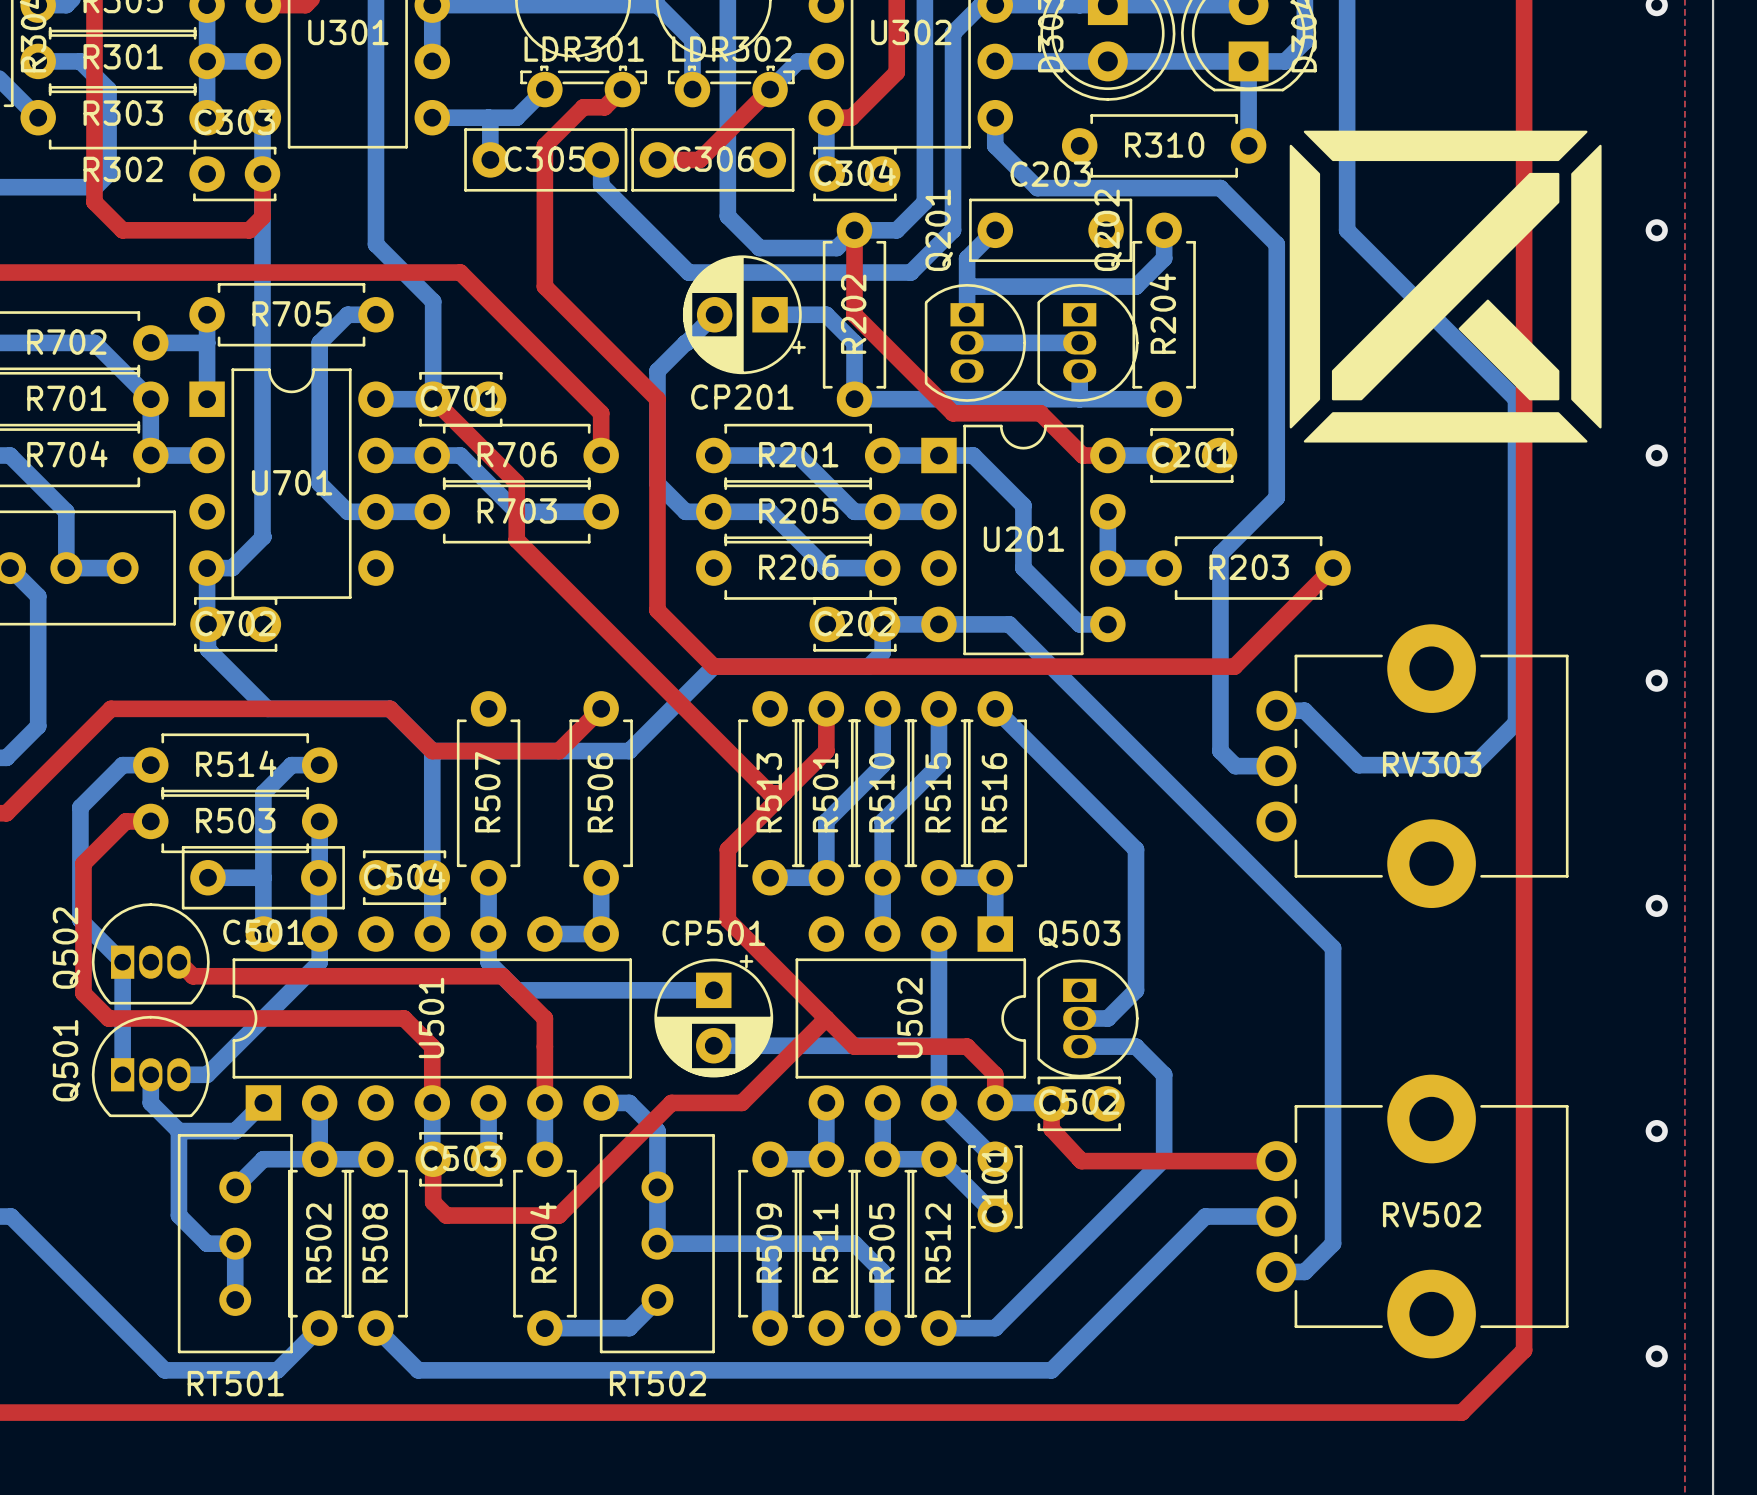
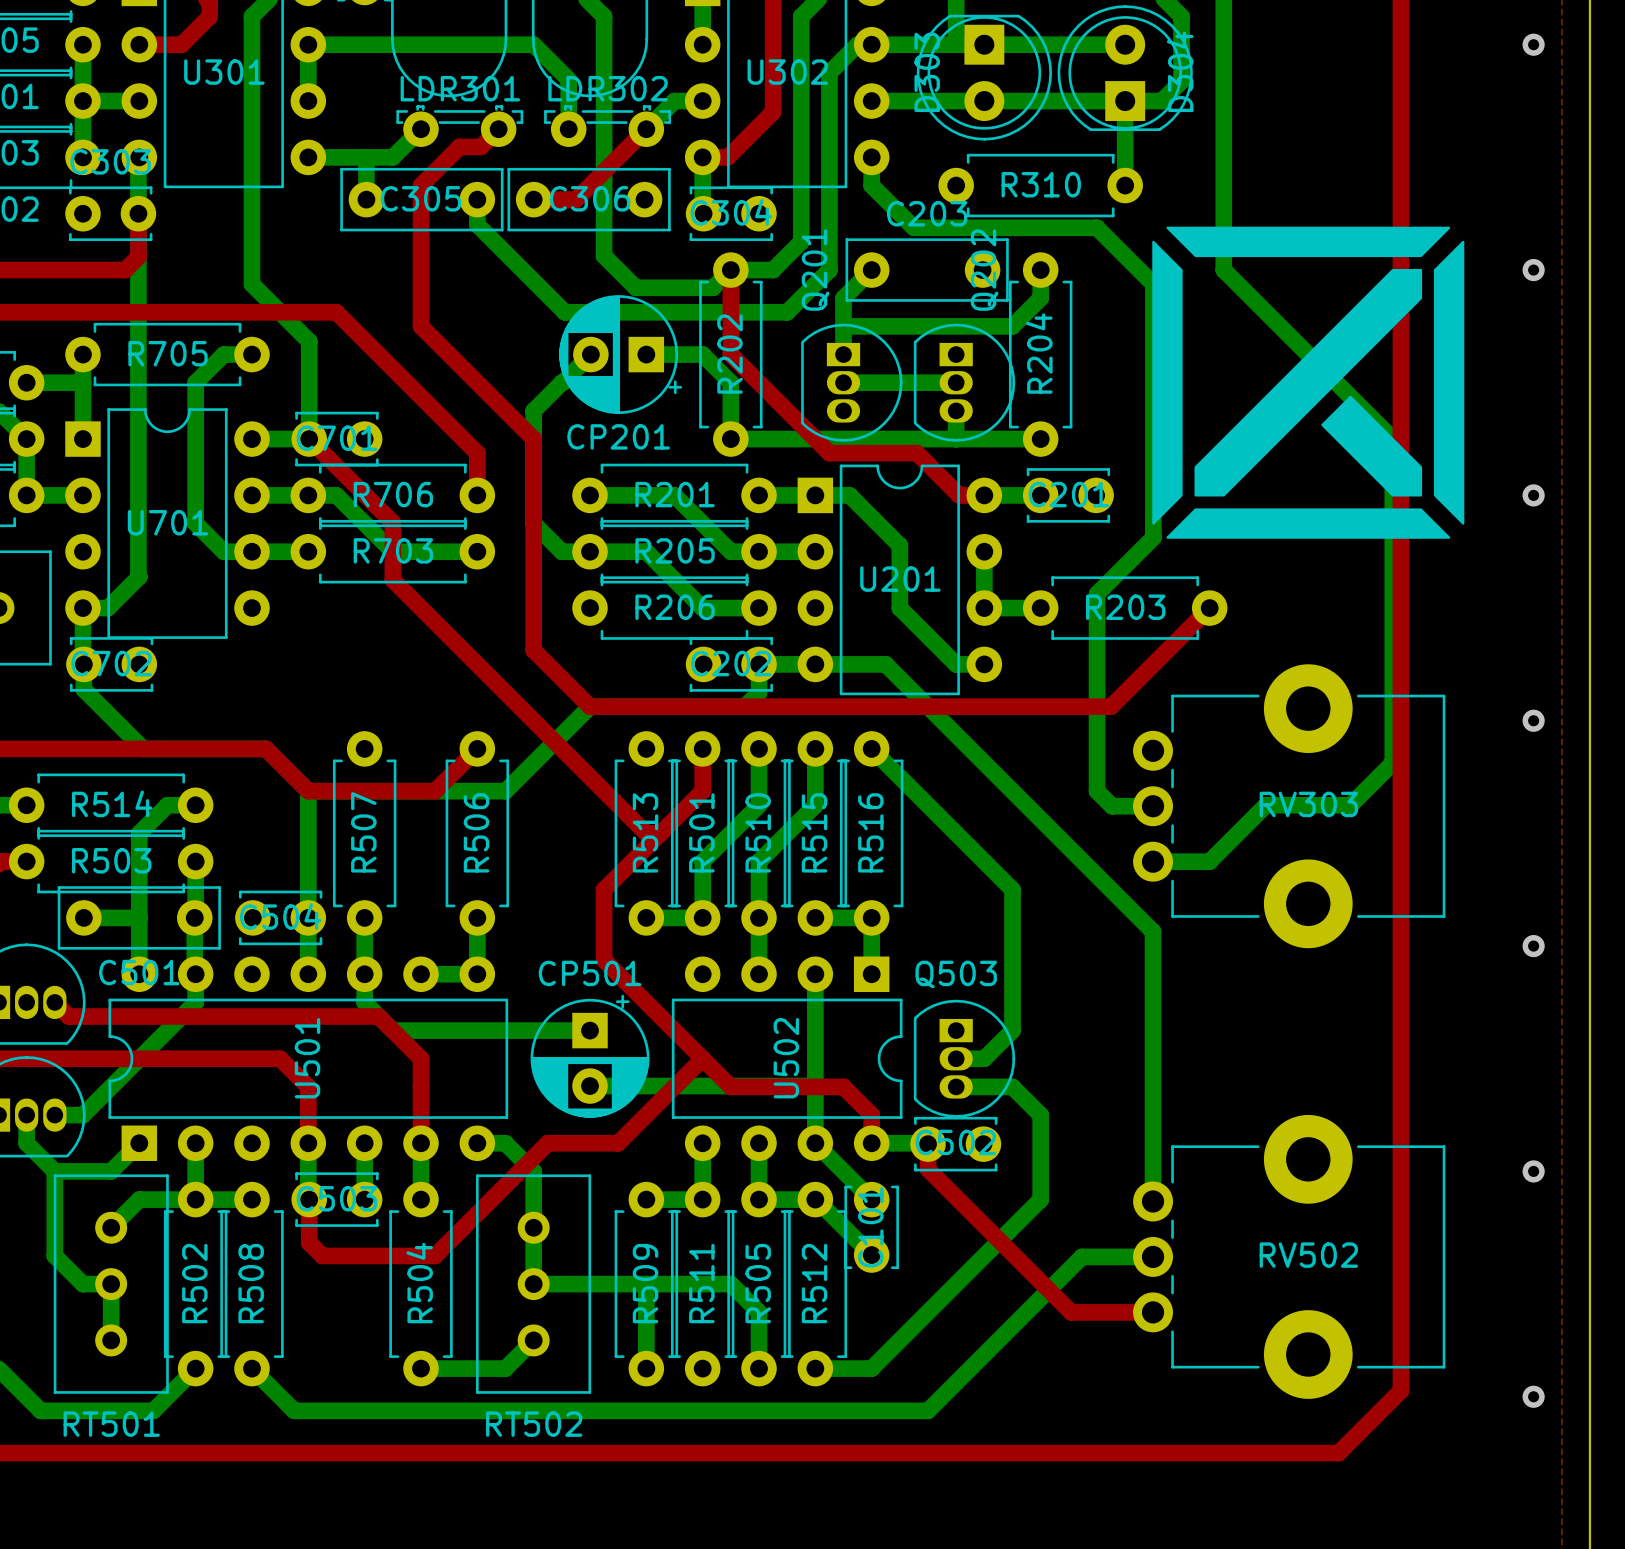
drawing position: (1445, 286) -> (1308, 382)
bottom track: (1276, 710) (1304, 710) (1359, 765) (1389, 765) -> (1153, 861) (1209, 861) (1266, 805)
bottom track: (1276, 891) (1333, 948) (1333, 1243) (1304, 1271) (1276, 1271) -> (1153, 931) (1153, 1201)
top track: (1051, 1128) (1081, 1161) (1276, 1161) -> (928, 1169) (1071, 1312) (1153, 1312)

